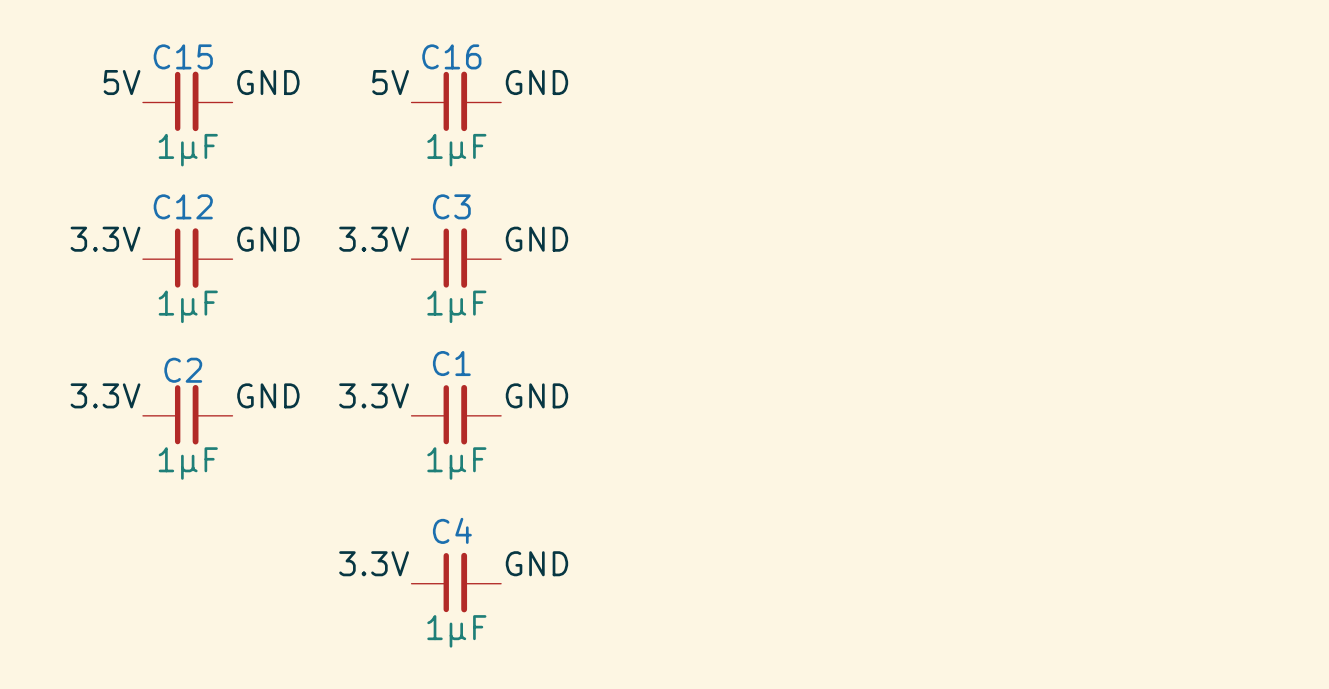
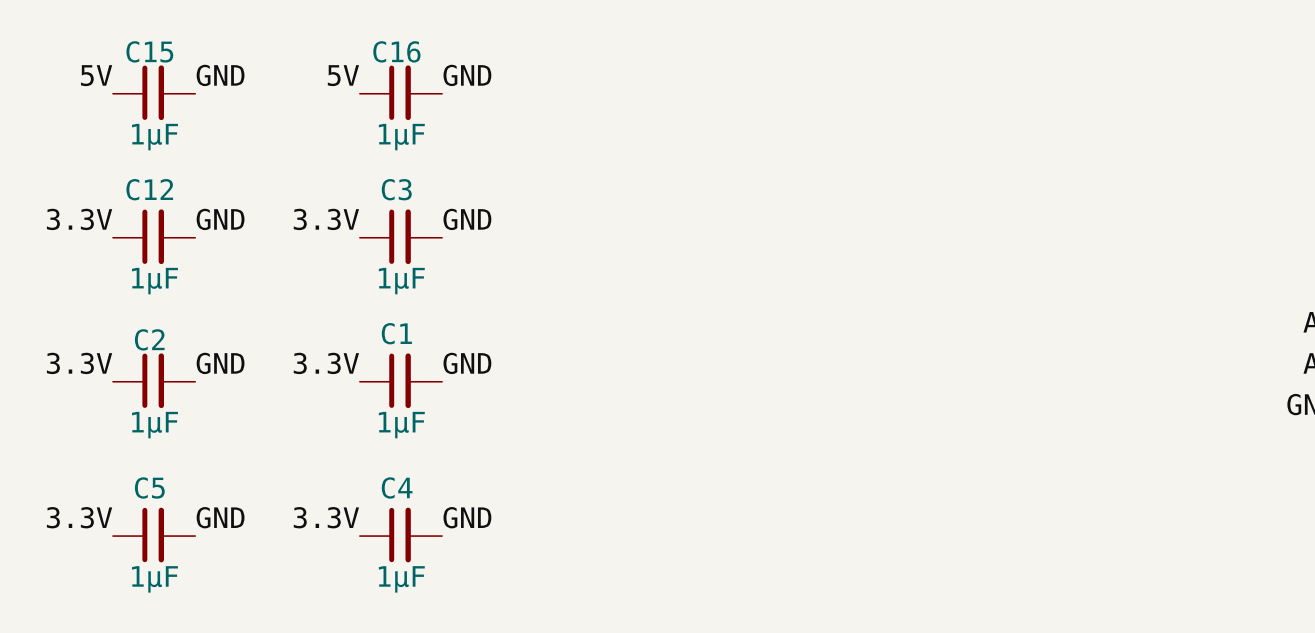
label: none -> 3.3V (79, 517)
label: none -> GND (220, 517)
C5: none -> 1μF (154, 535)

